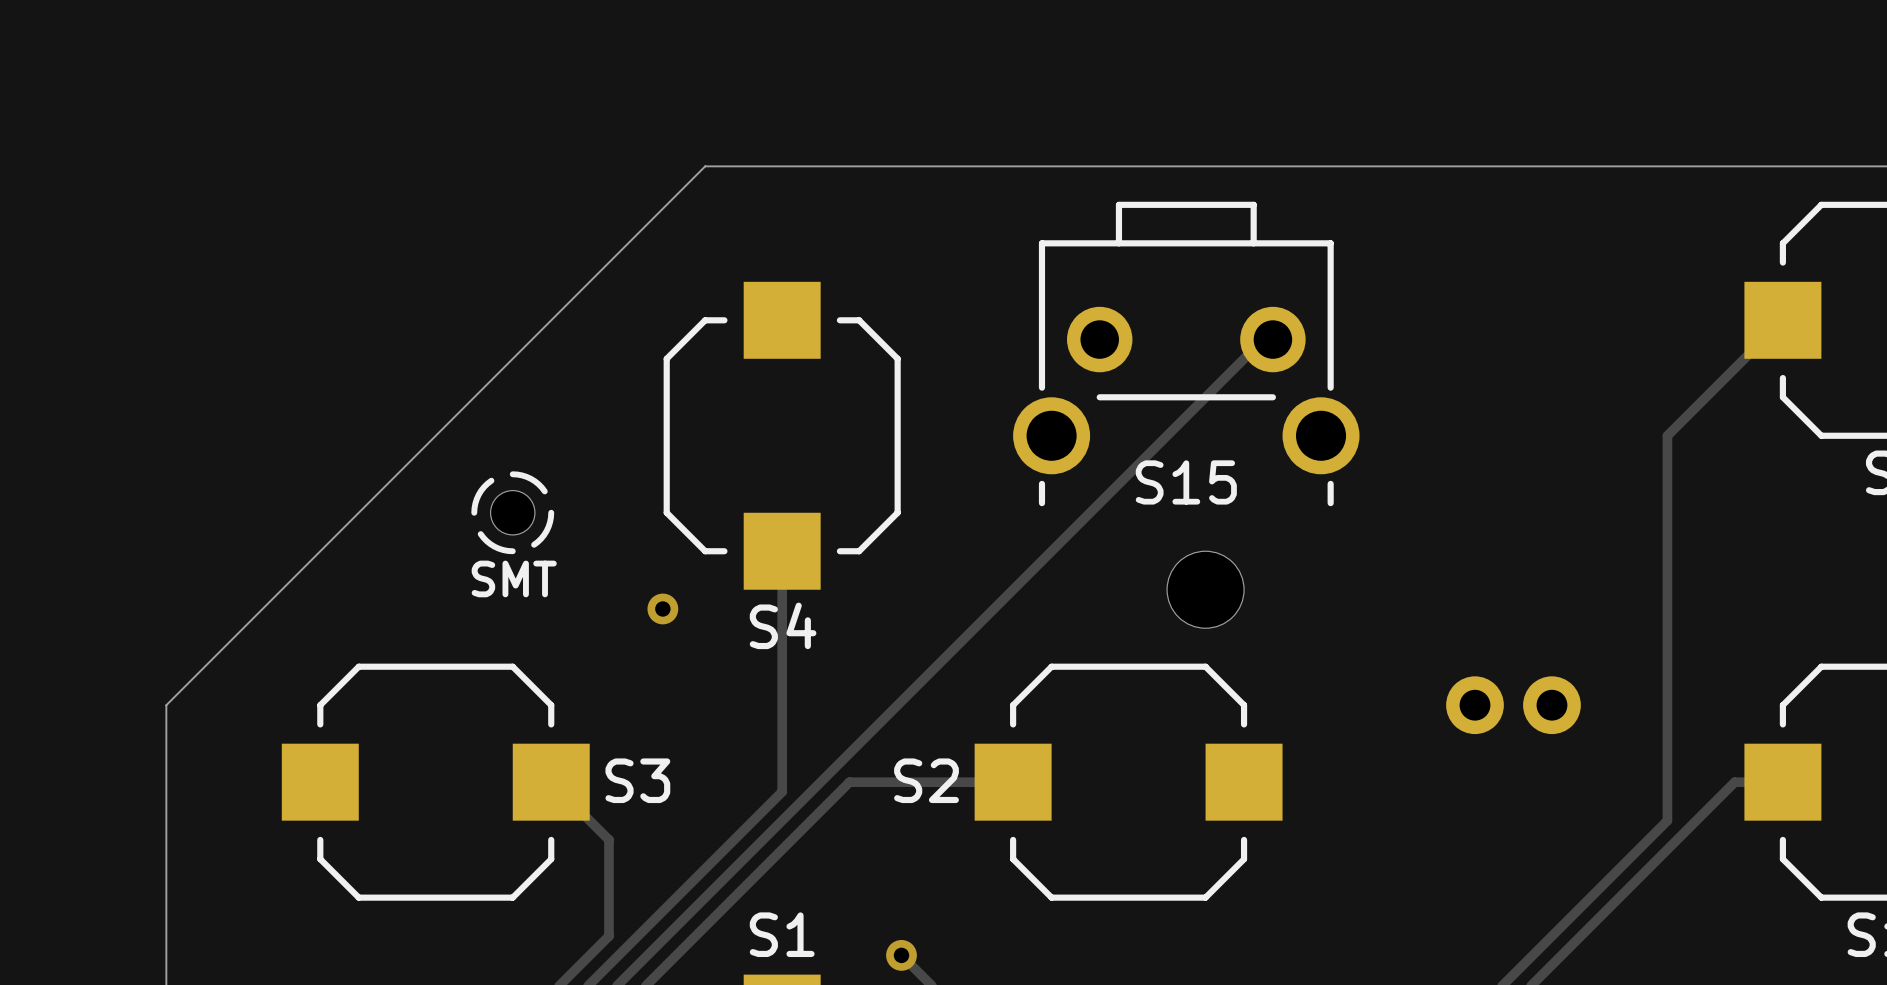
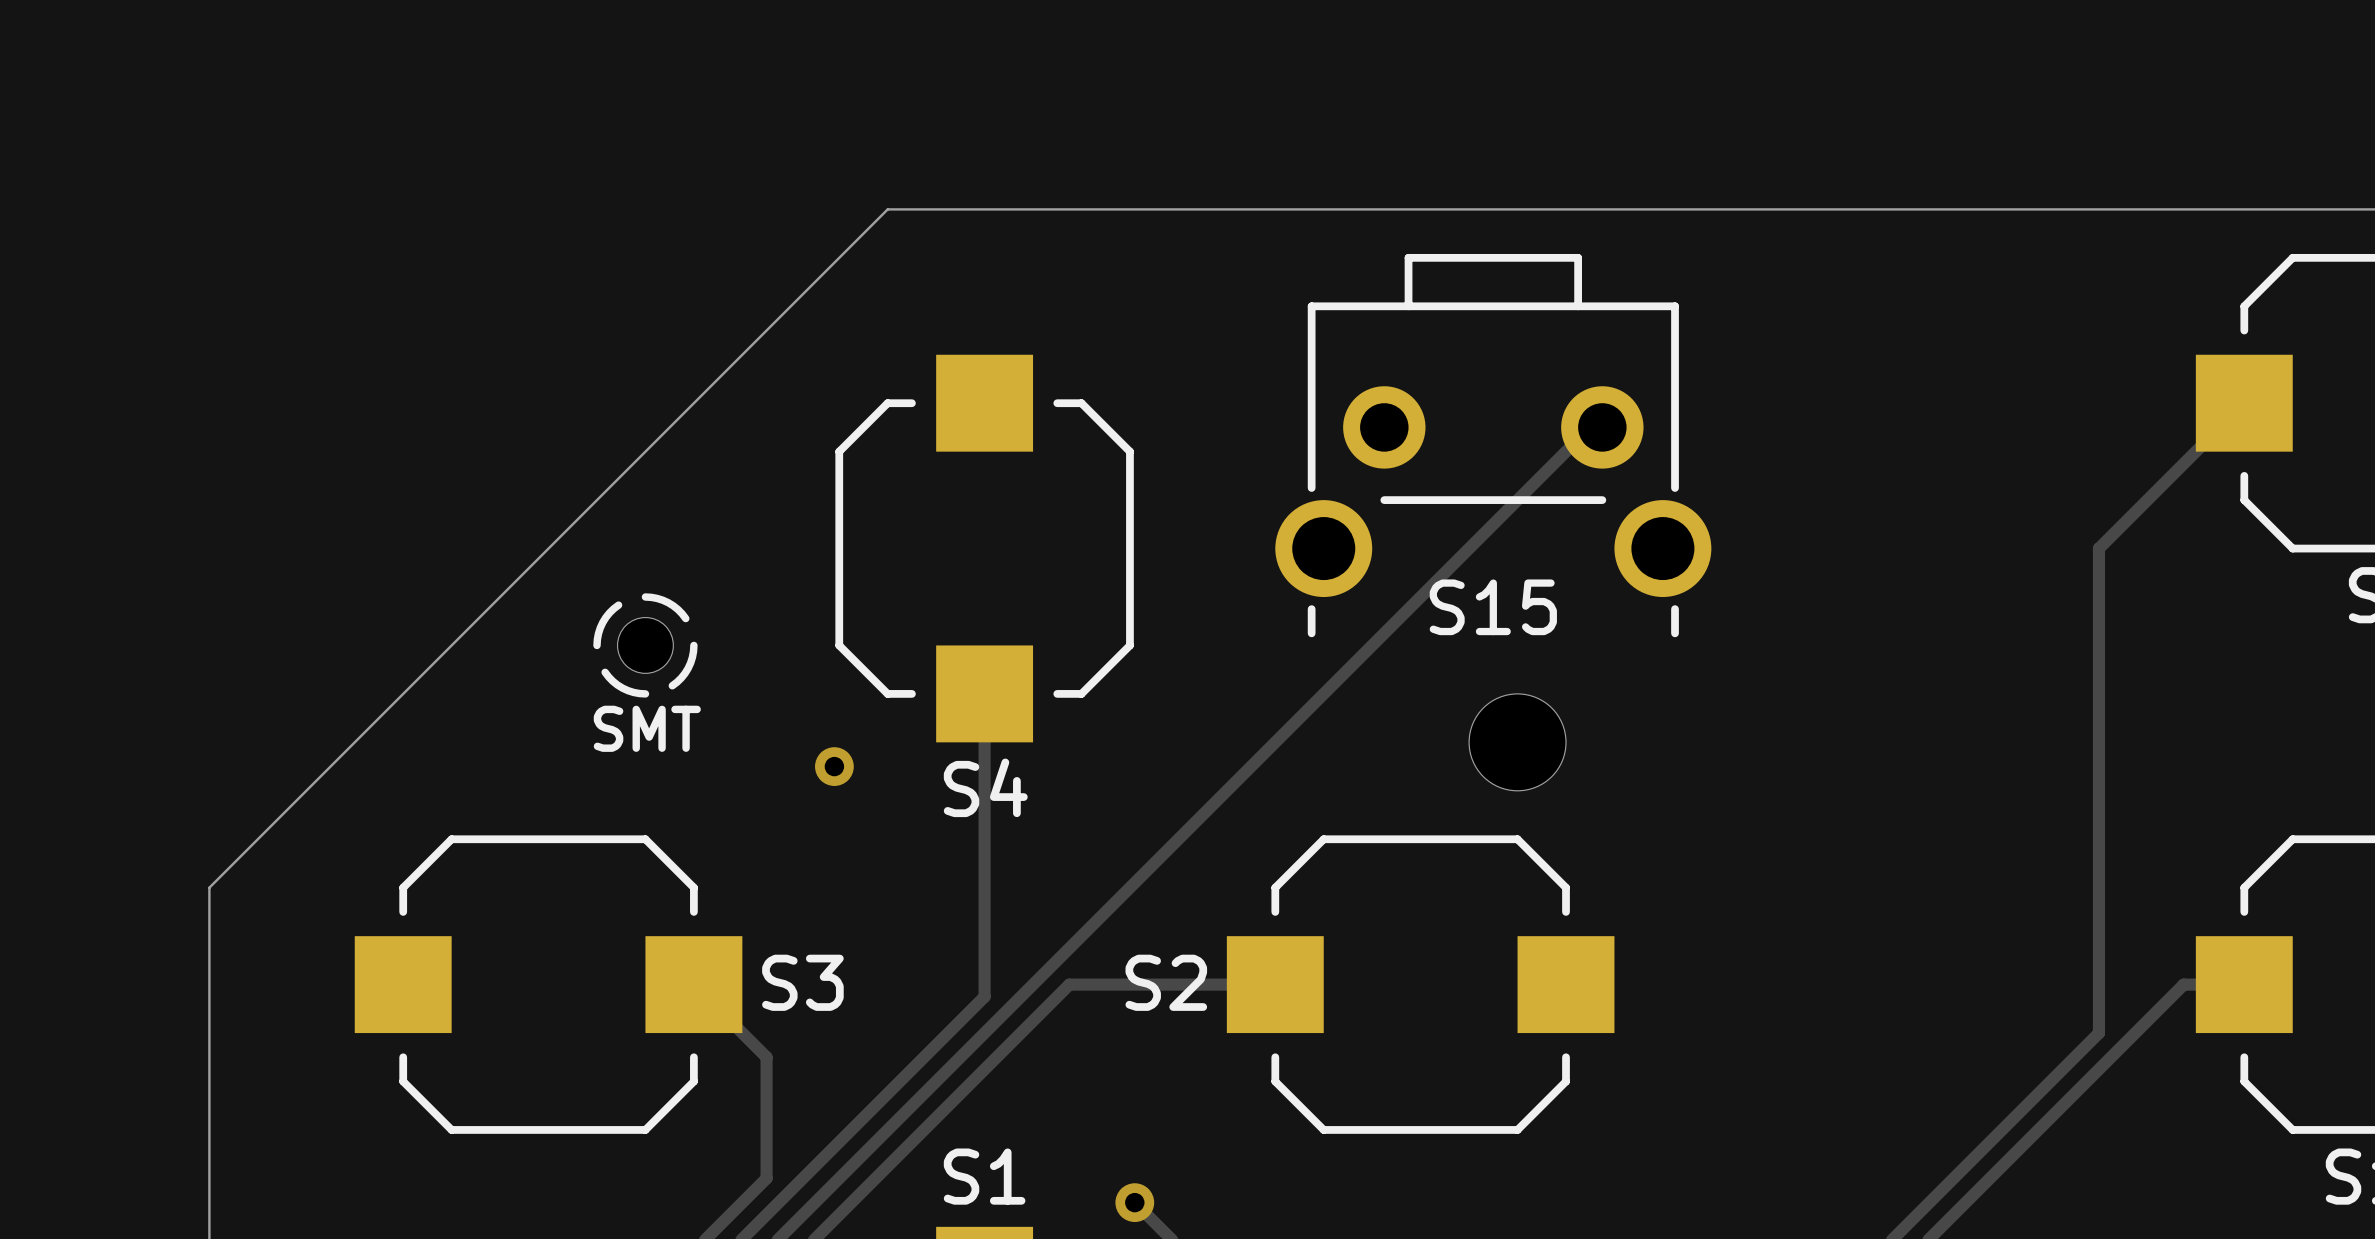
part: (1513, 705) -> none

